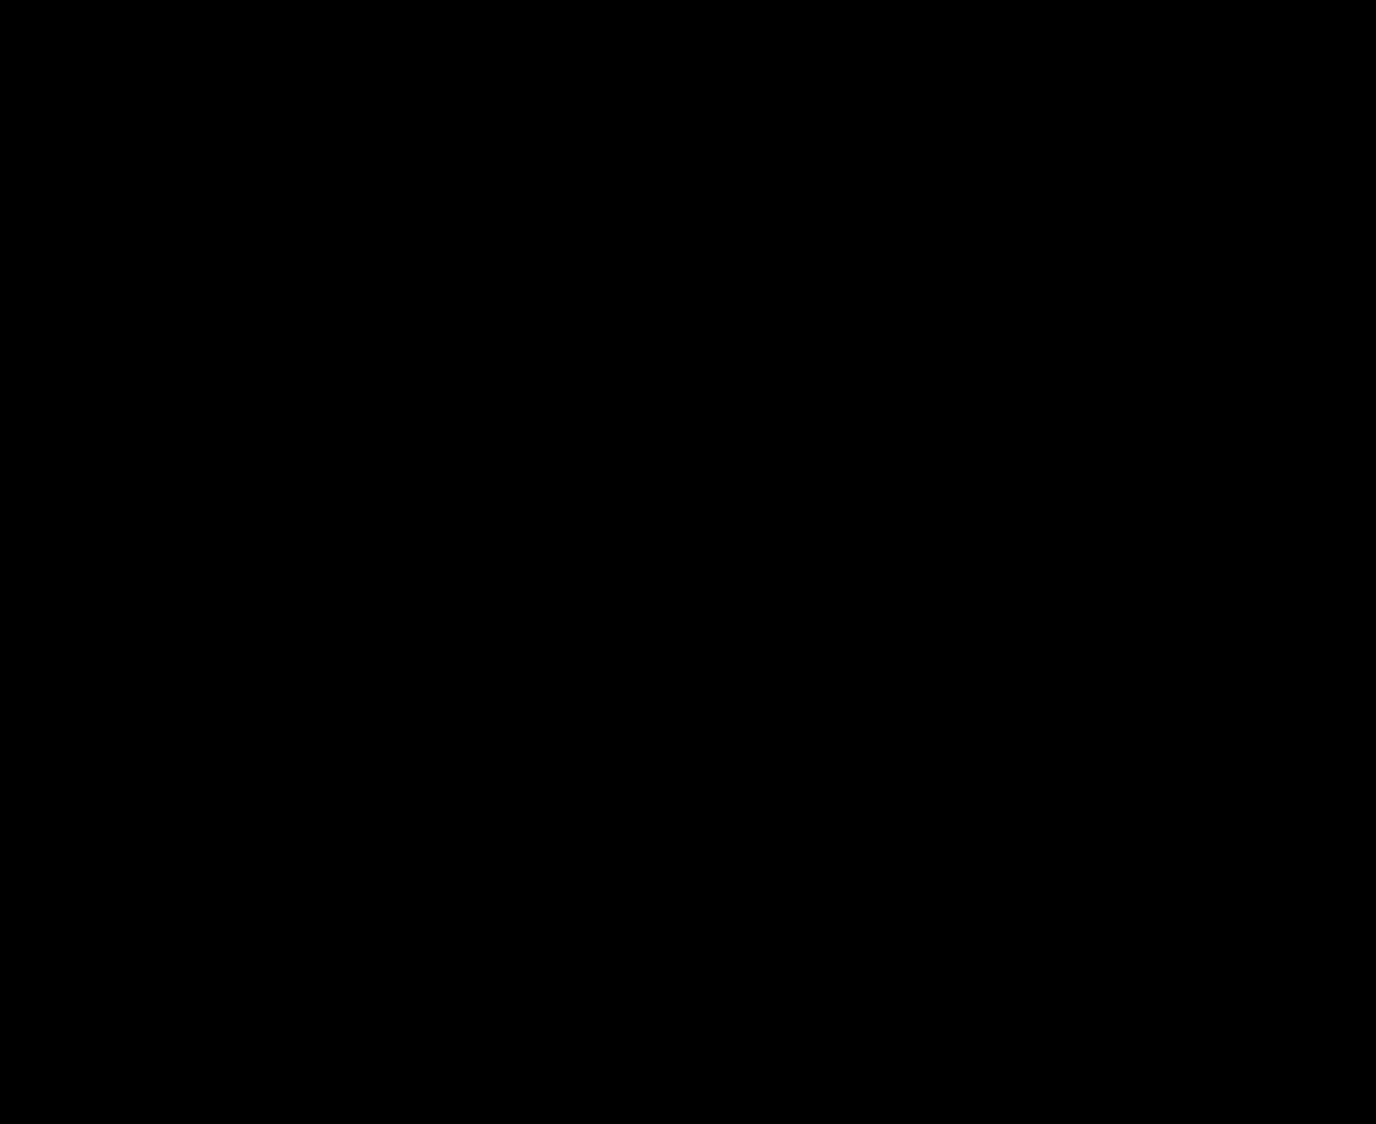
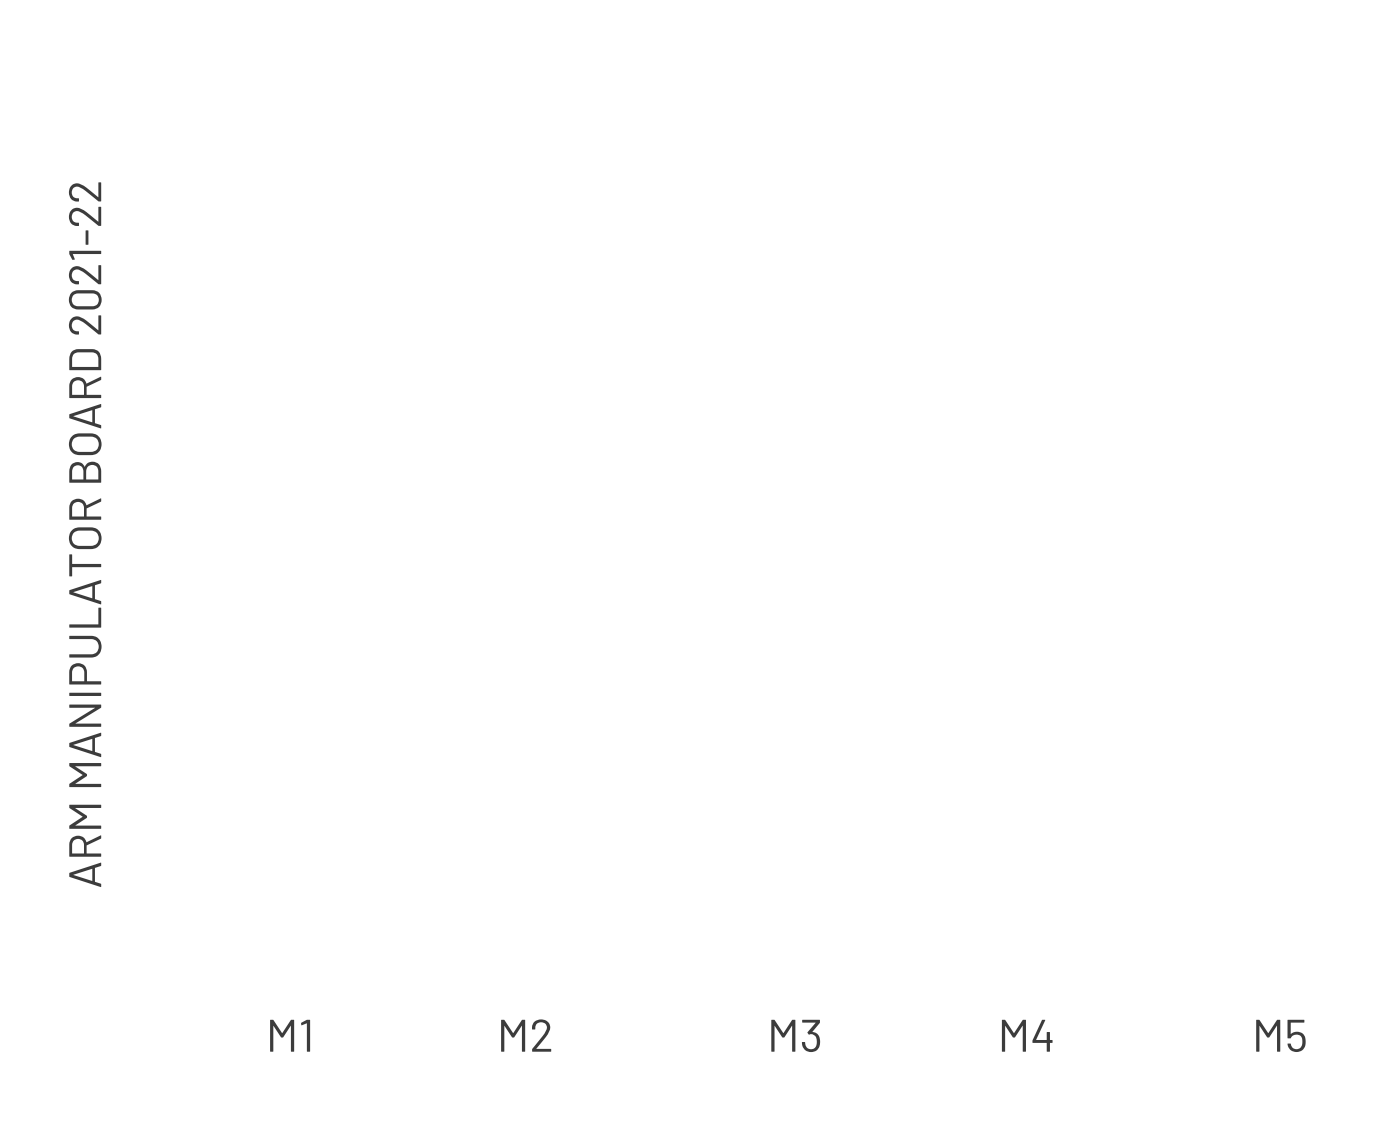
text: none -> ARM MANIPULATOR BOARD 2021-22 (85, 534)
text: none -> M4 (1027, 1035)
text: none -> M1 (290, 1035)
text: none -> M2 (526, 1035)
text: none -> M3 (795, 1035)
text: none -> M5 (1280, 1035)

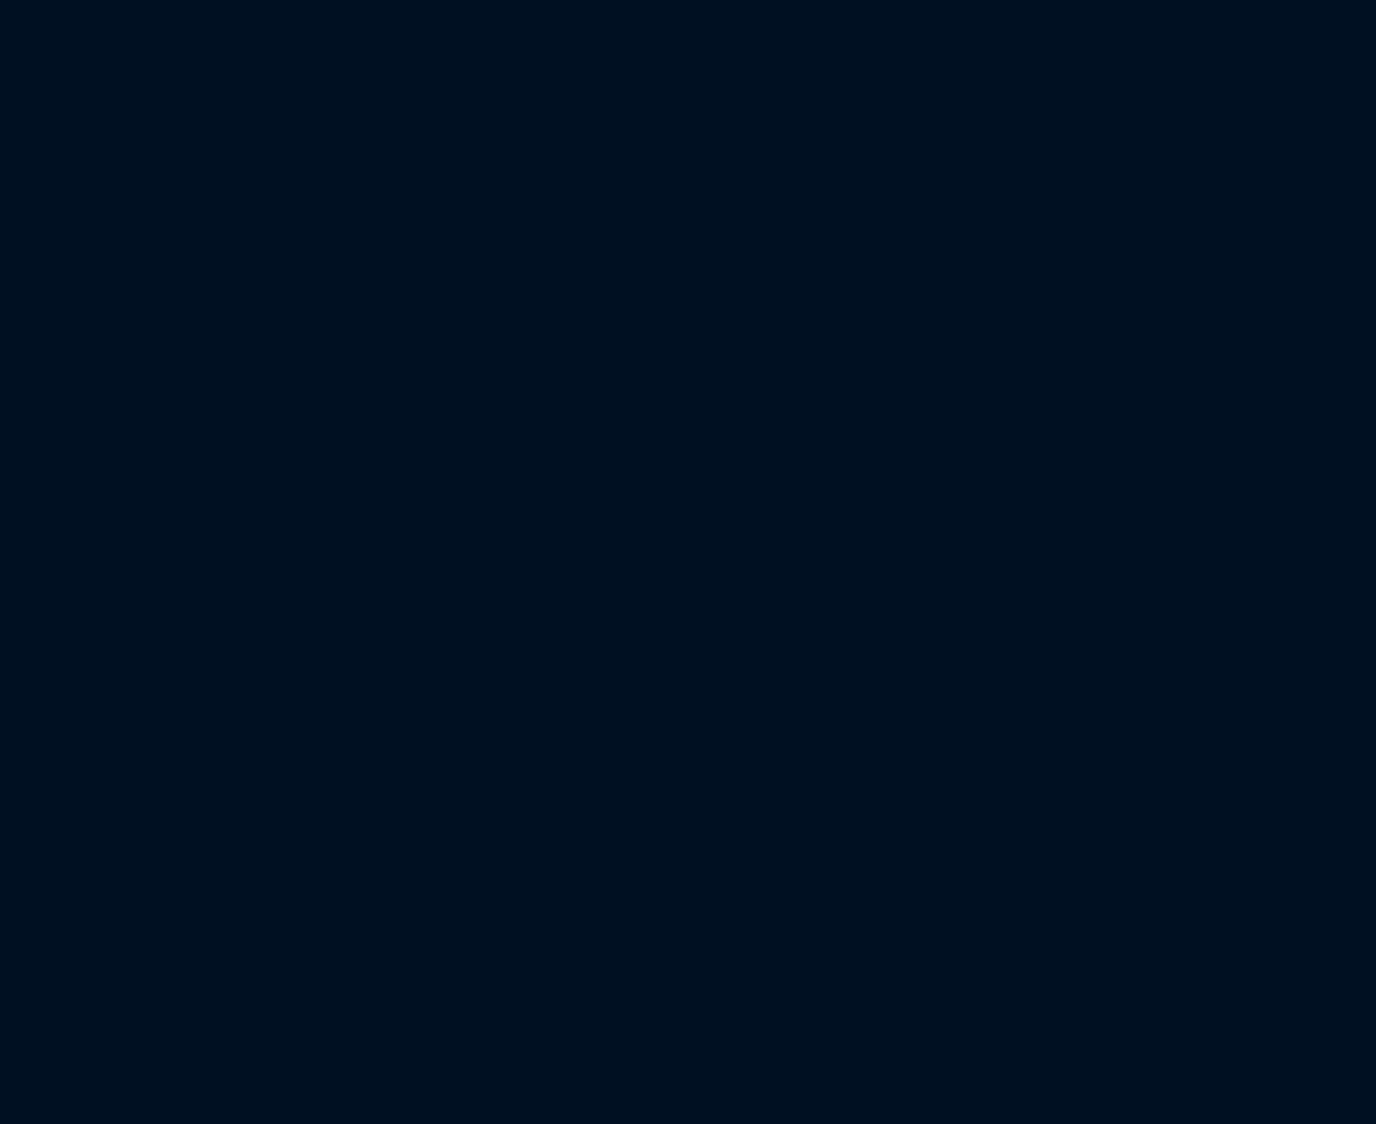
text: ARM MANIPULATOR BOARD 2021-22 (85, 534) -> none
text: M1 (290, 1035) -> none
text: M2 (526, 1035) -> none
text: M3 (795, 1035) -> none
text: M4 (1027, 1035) -> none
text: M5 (1280, 1035) -> none

